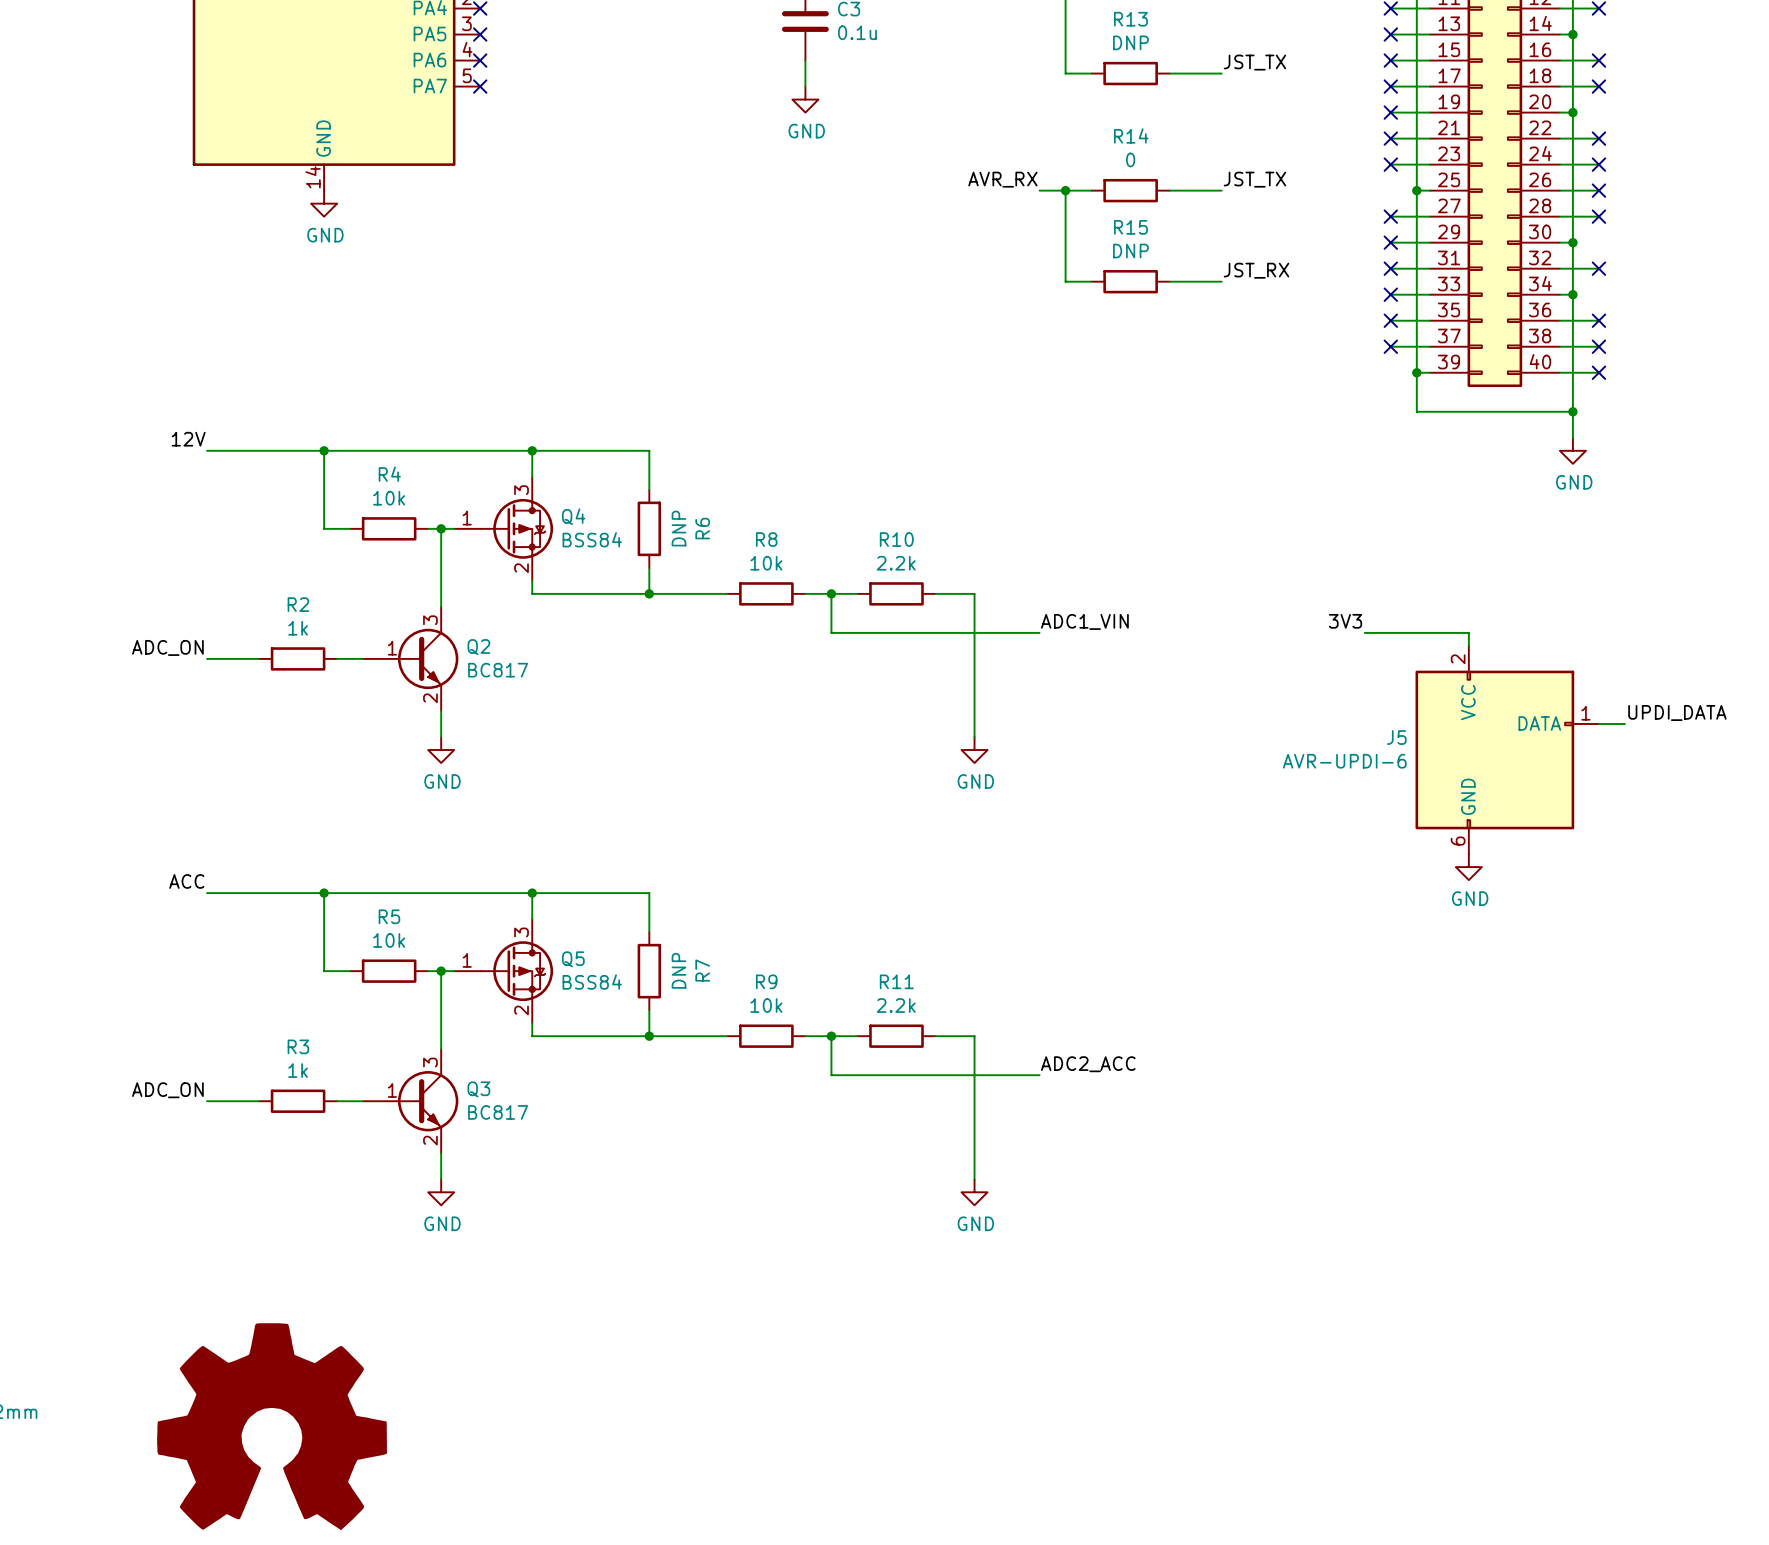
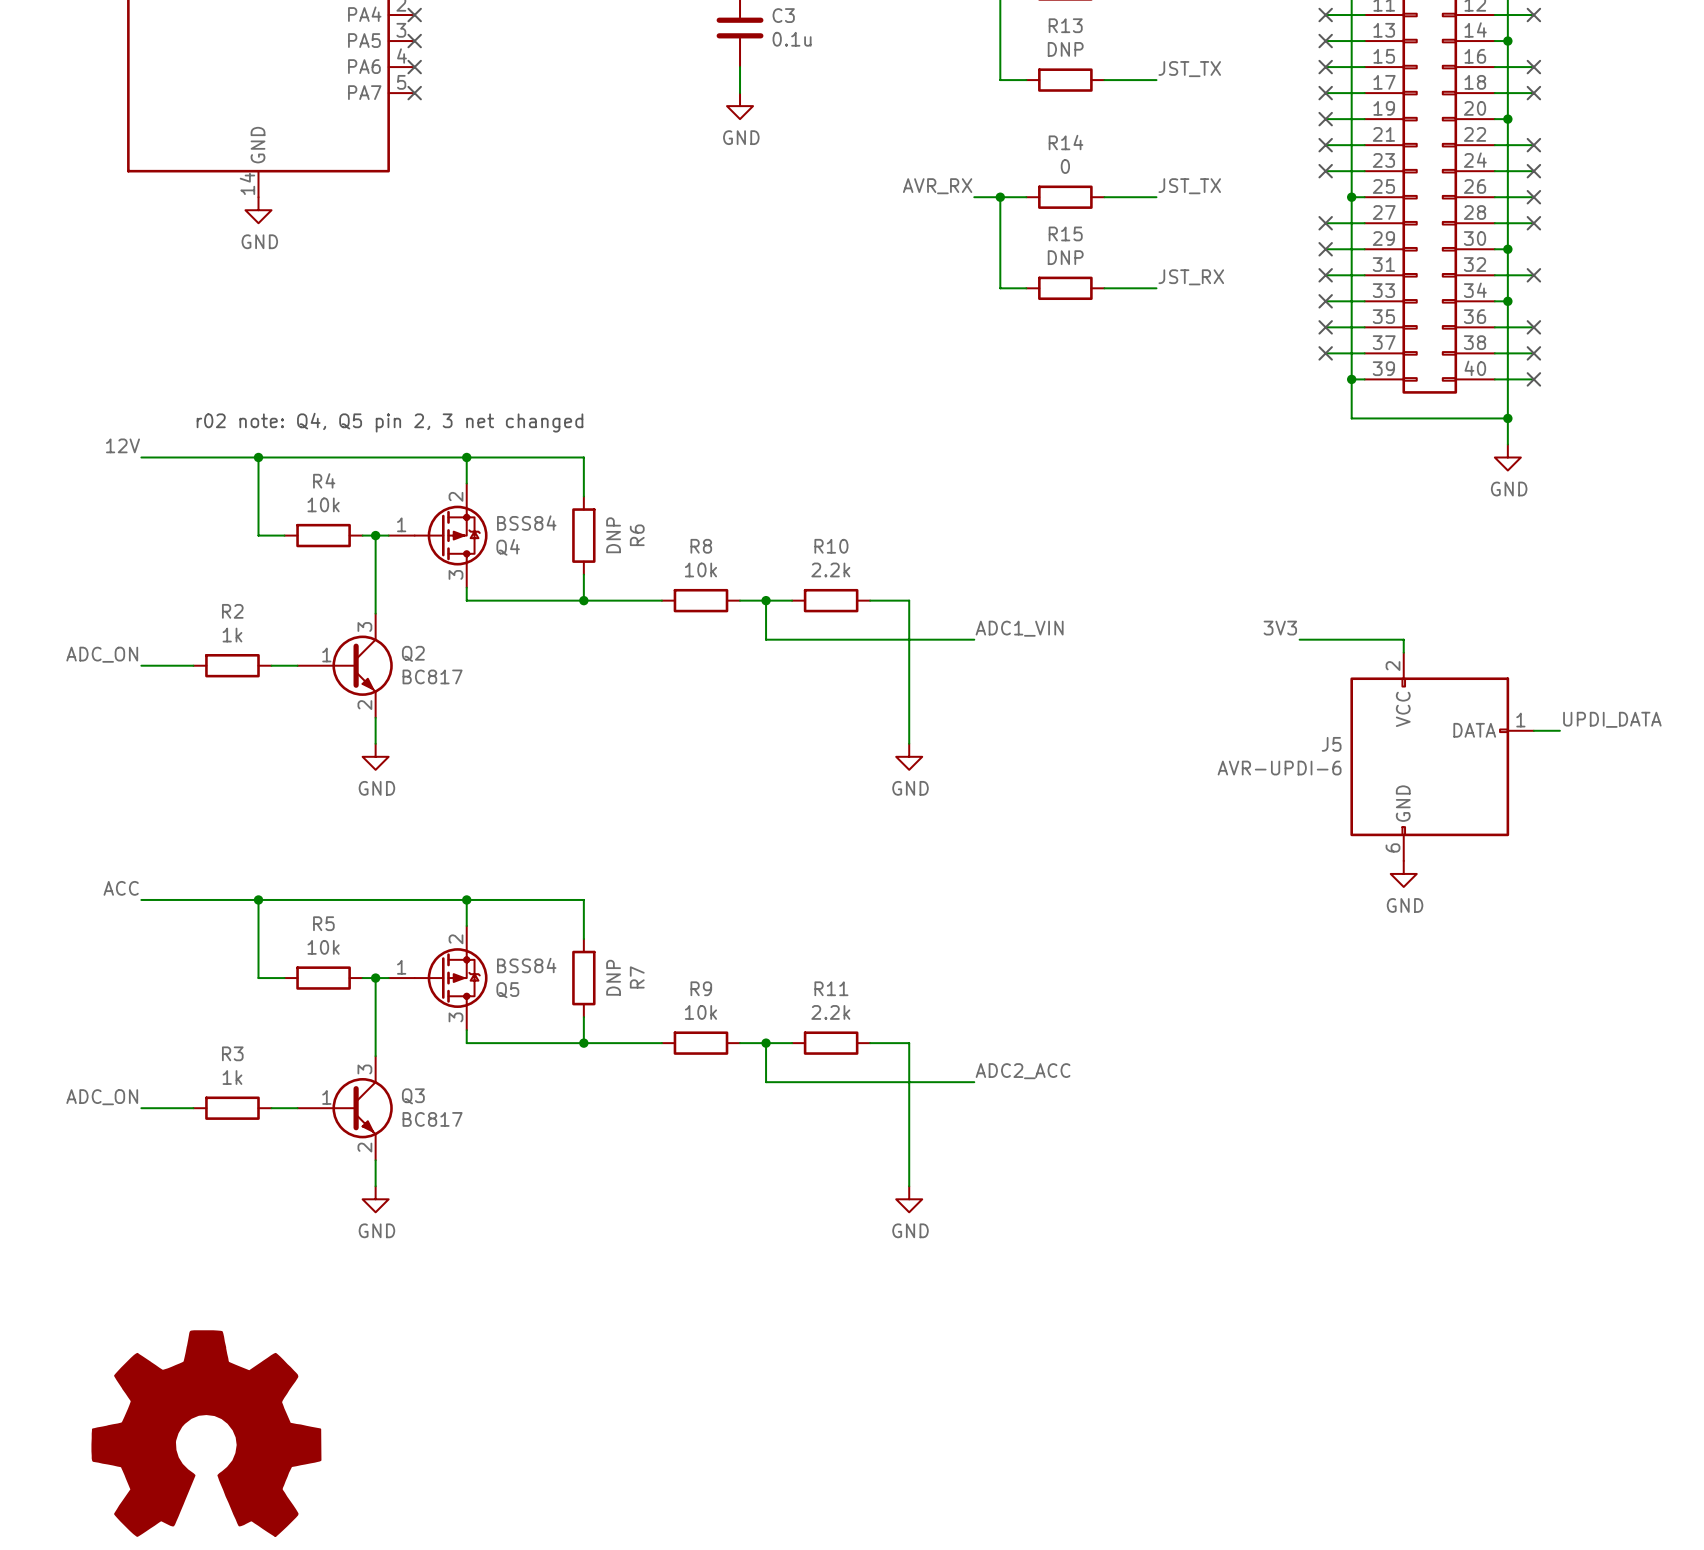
text: none -> r02 note: Q4, Q5 pin 2, 3 net changed (389, 422)
Q4 flip: as is (516, 528) -> up-down (451, 535)
Q5 flip: as is (516, 971) -> up-down (451, 978)

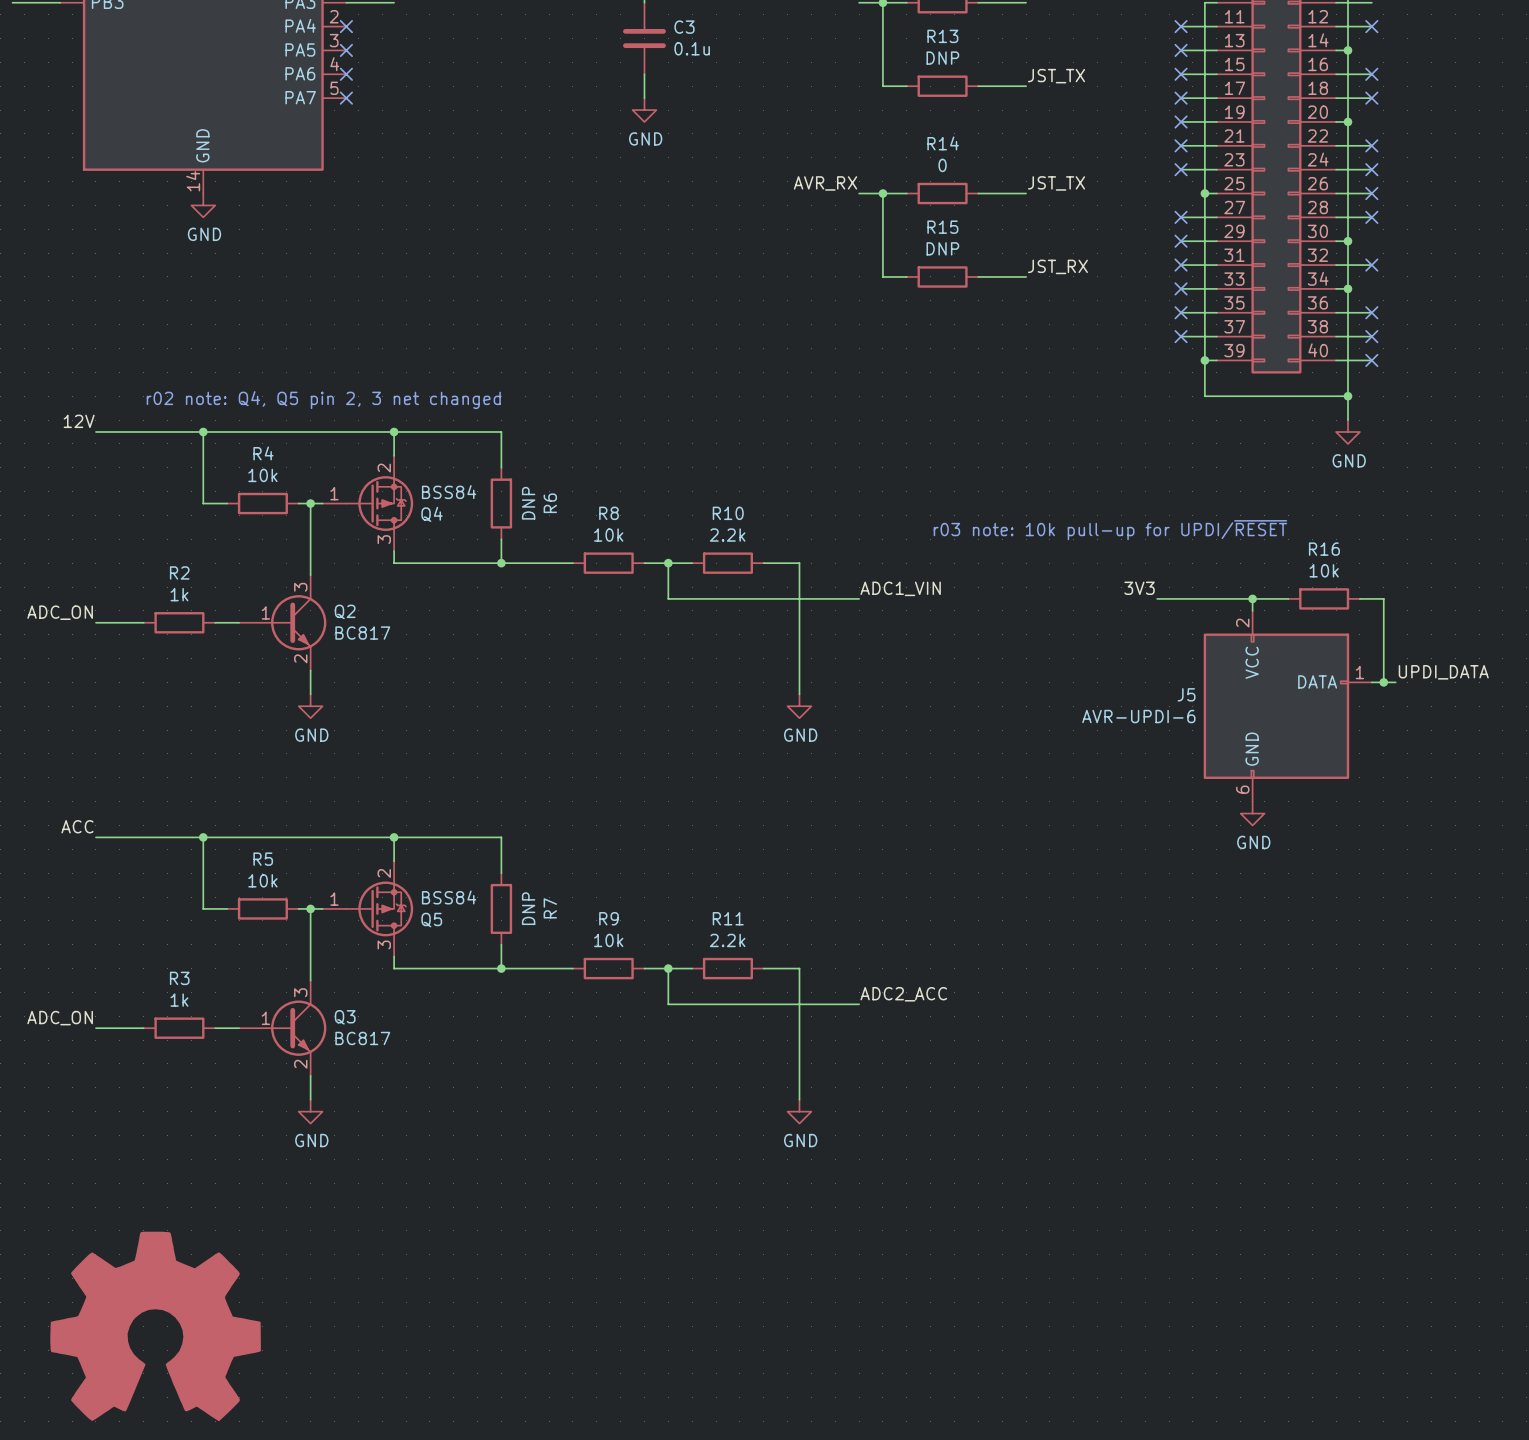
text: none -> r03 note: 10k pull-up for UPDI/~{RESET} (1110, 530)
wire: none -> (1252, 598) (1288, 598)
junction: none -> (1252, 598)
R16: none -> 10k (1324, 598)
wire: none -> (1359, 598) (1383, 598) (1383, 682)
junction: none -> (1383, 682)

